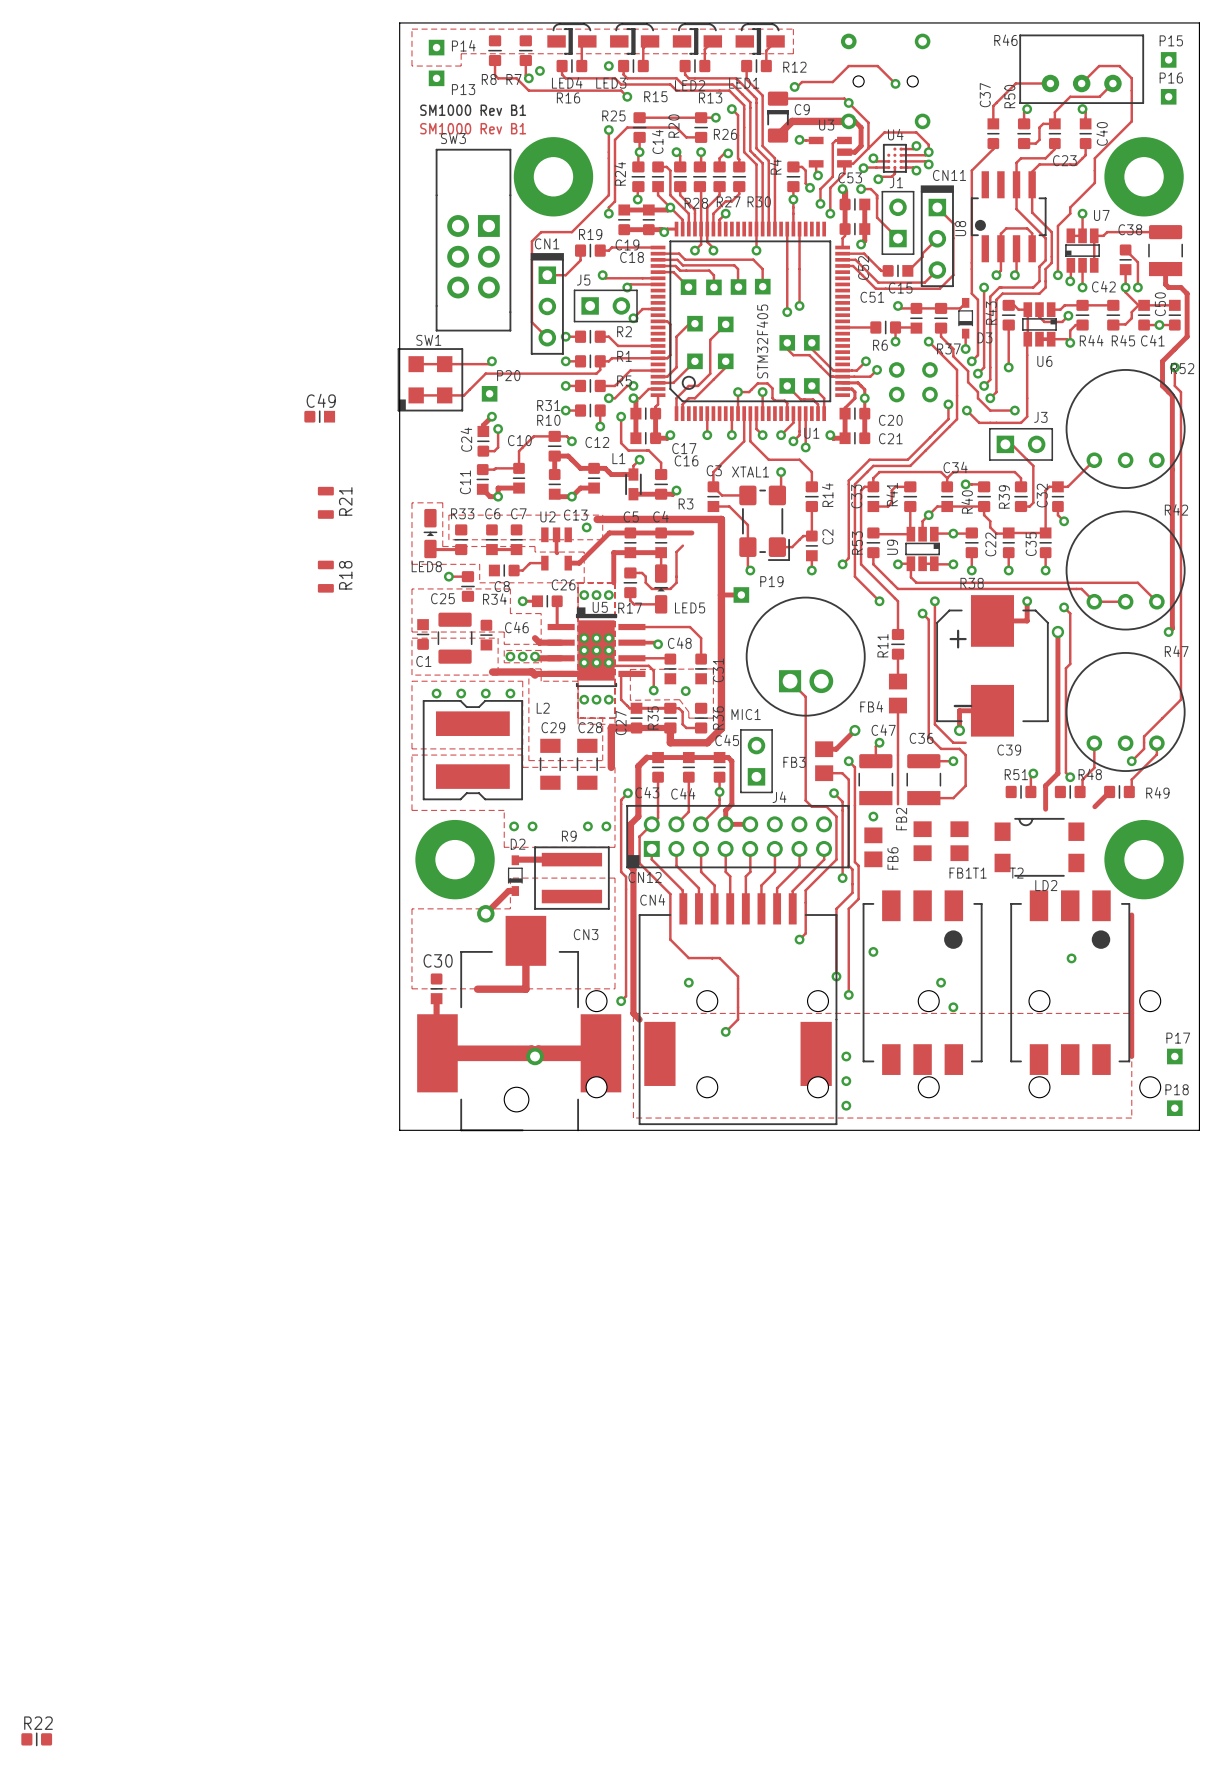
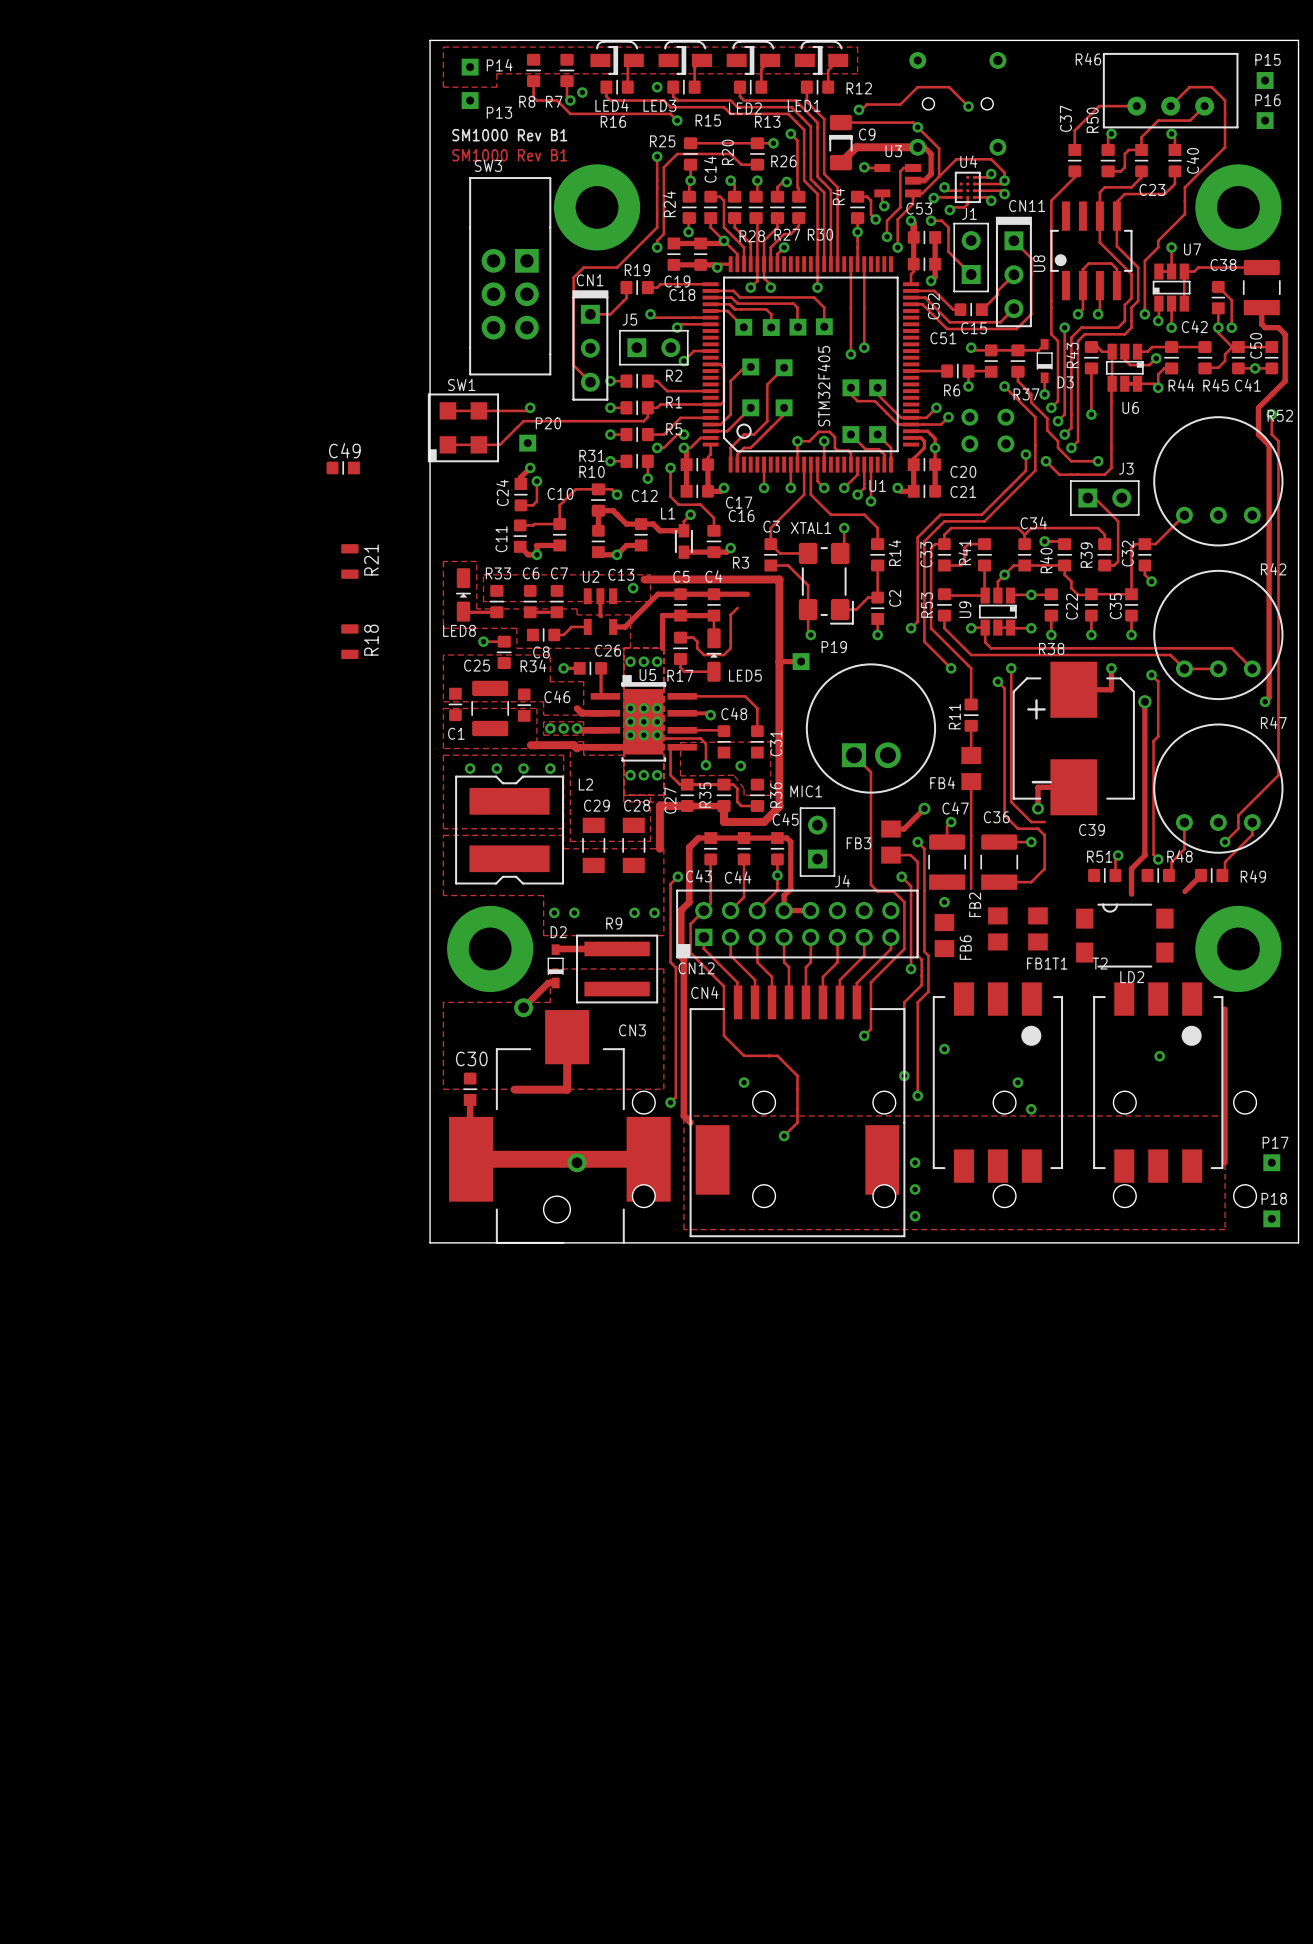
R22: (36, 1739) -> none

